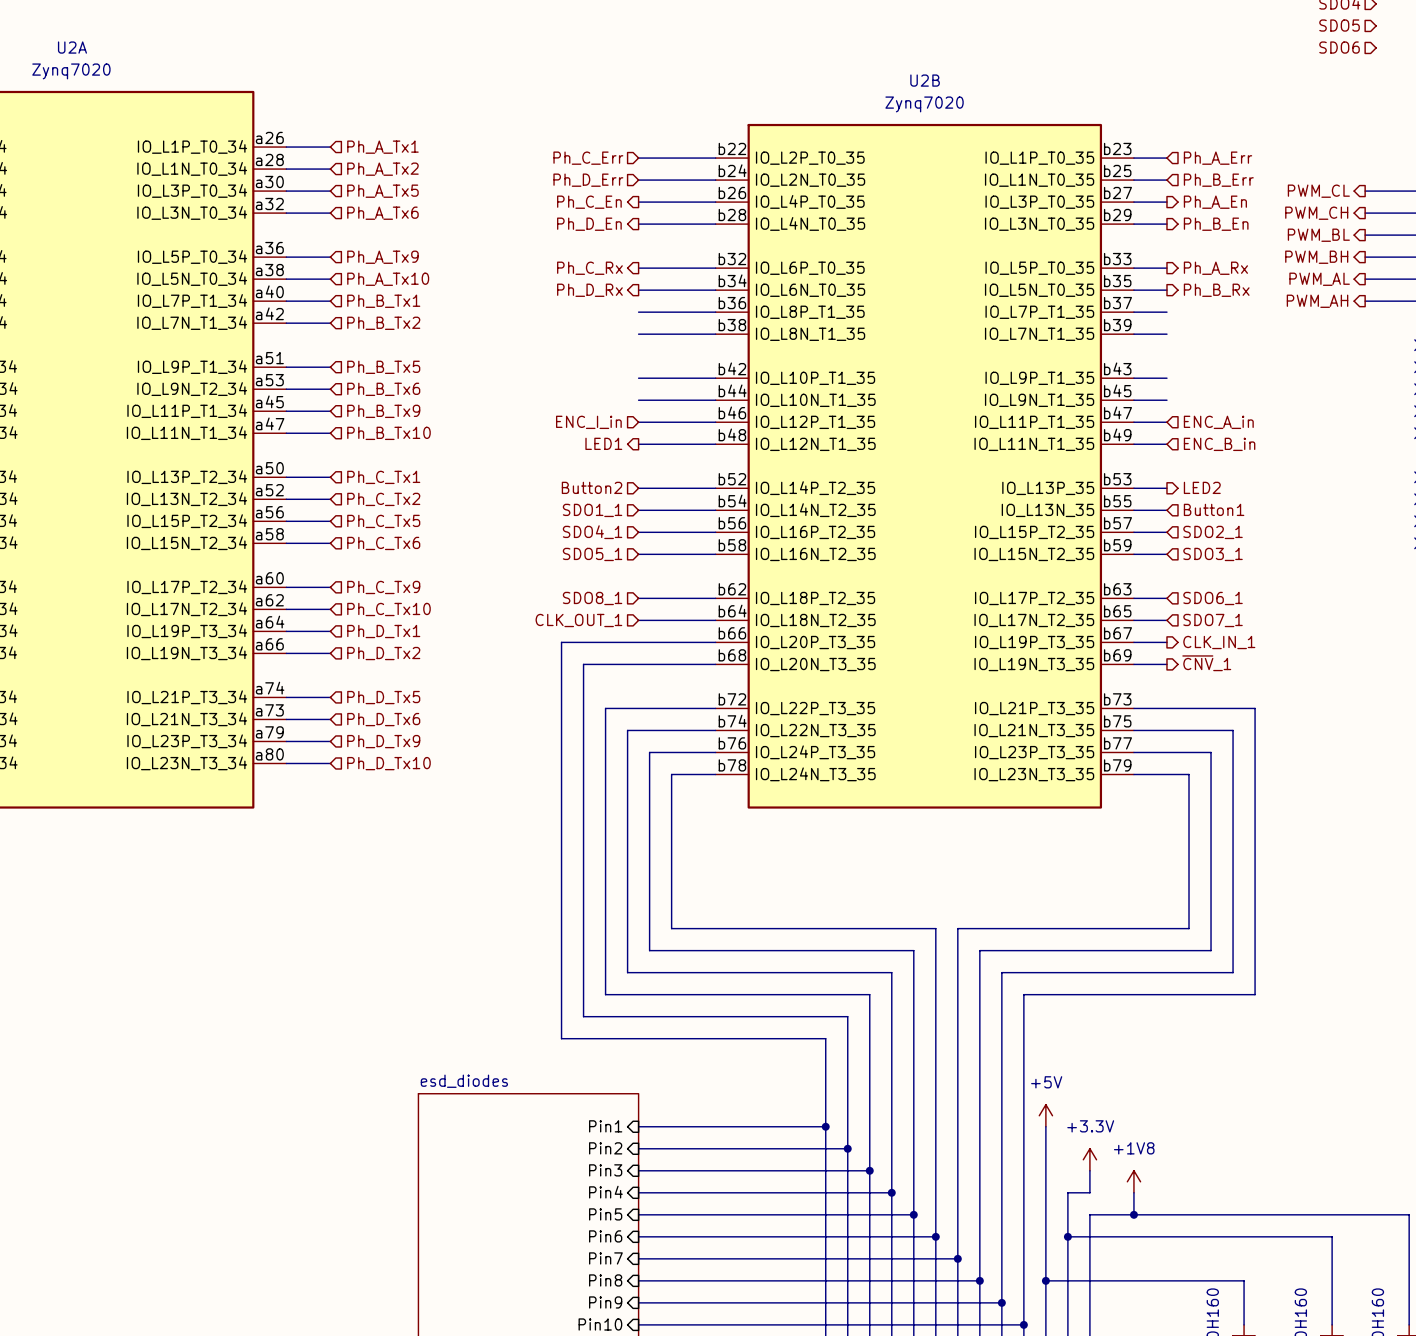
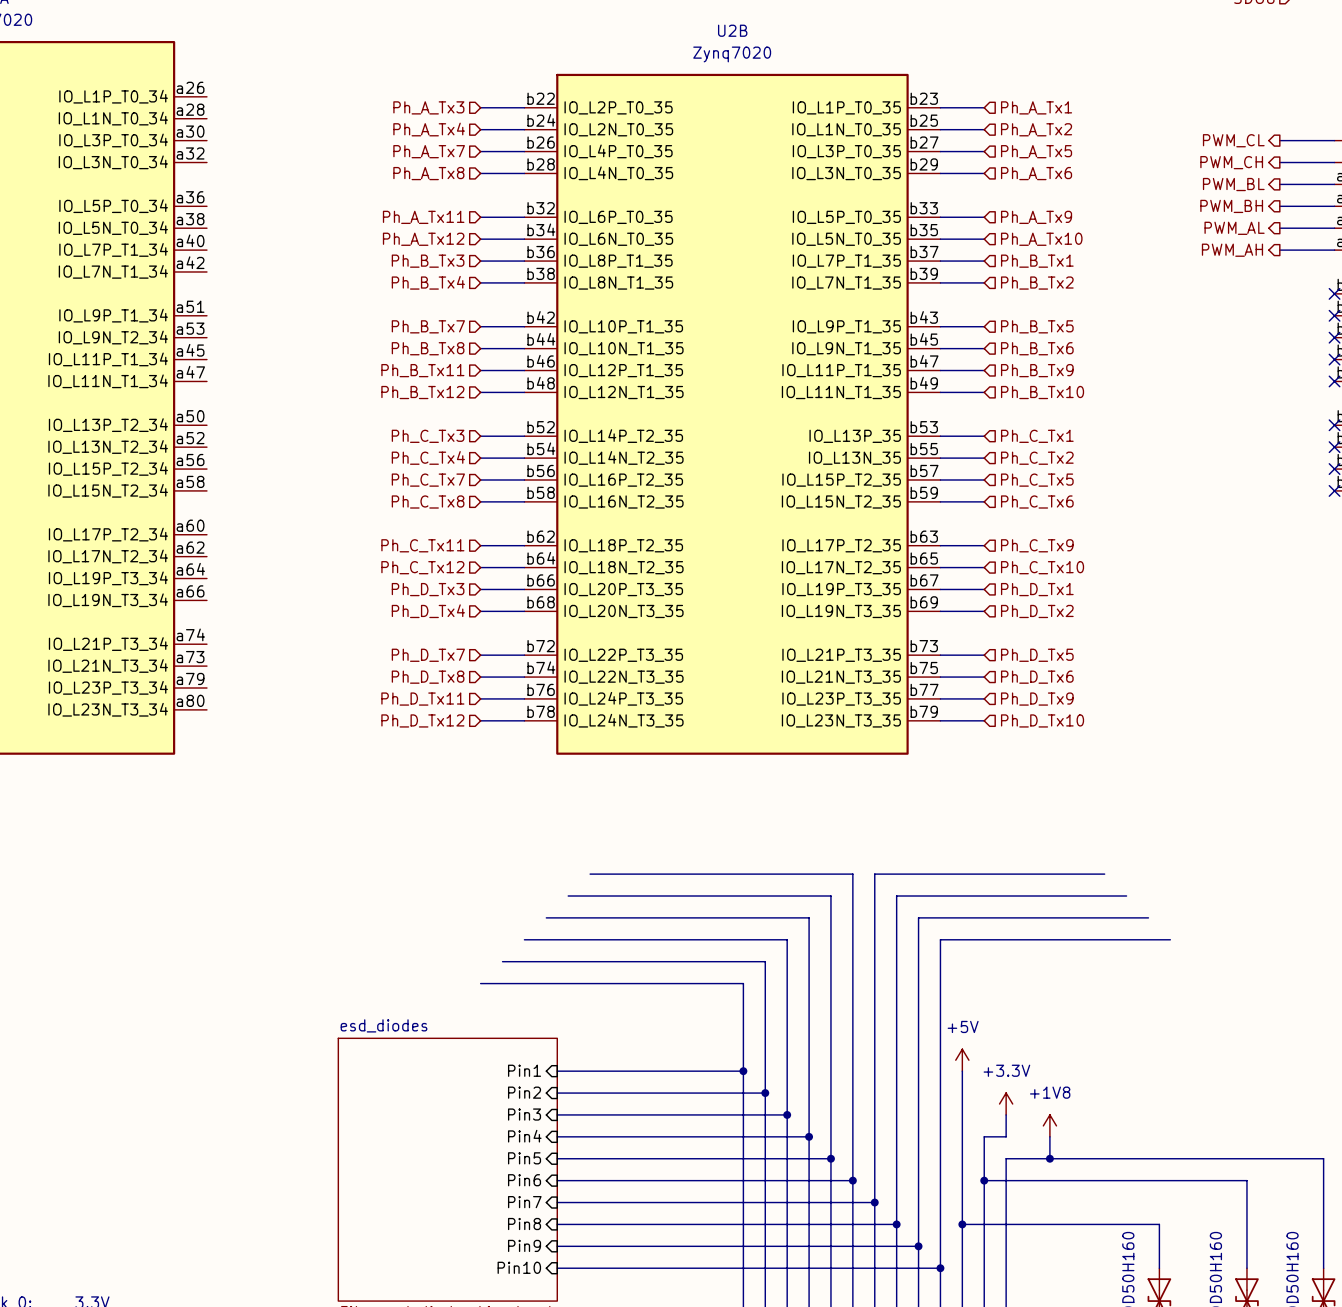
wire: (286, 147) (330, 147) -> none
hierarchical label: Ph_A_Tx1 (382, 147) -> none
hierarchical label: none -> Ph_A_Tx3 (428, 107)
wire: none -> (480, 107) (524, 107)
hierarchical label: Ph_C_Err (588, 158) -> none
hierarchical label: none -> Ph_A_Tx1 (1036, 107)
wire: (1133, 158) (1166, 158) -> none
hierarchical label: Ph_A_Err (1218, 158) -> none
wire: (286, 169) (330, 169) -> none
hierarchical label: Ph_A_Tx2 (382, 169) -> none
hierarchical label: none -> Ph_A_Tx4 (429, 129)
wire: none -> (480, 129) (524, 129)
hierarchical label: Ph_D_Err (588, 180) -> none
hierarchical label: none -> Ph_A_Tx2 (1036, 129)
wire: (1133, 180) (1166, 180) -> none
hierarchical label: Ph_B_Err (1218, 180) -> none
wire: (286, 191) (330, 191) -> none
hierarchical label: Ph_A_Tx5 (382, 191) -> none
hierarchical label: none -> Ph_A_Tx7 (429, 151)
wire: none -> (480, 151) (524, 151)
hierarchical label: Ph_C_En (589, 202) -> none
hierarchical label: none -> Ph_A_Tx5 (1036, 151)
wire: (1133, 202) (1166, 202) -> none
hierarchical label: Ph_A_En (1215, 202) -> none
wire: (286, 213) (330, 213) -> none
hierarchical label: Ph_A_Tx6 (382, 213) -> none
hierarchical label: none -> Ph_A_Tx8 (428, 173)
wire: none -> (480, 173) (524, 173)
hierarchical label: Ph_D_En (589, 224) -> none
hierarchical label: none -> Ph_A_Tx6 (1036, 173)
wire: (1133, 224) (1166, 224) -> none
hierarchical label: Ph_B_En (1216, 224) -> none
wire: (286, 257) (330, 257) -> none
hierarchical label: Ph_A_Tx9 (382, 257) -> none
hierarchical label: none -> Ph_A_Tx11 (423, 217)
wire: none -> (480, 217) (524, 217)
hierarchical label: Ph_C_Rx (589, 268) -> none
hierarchical label: none -> Ph_A_Tx9 (1036, 217)
wire: (1133, 268) (1166, 268) -> none
hierarchical label: Ph_A_Rx (1215, 268) -> none
wire: (286, 279) (330, 279) -> none
hierarchical label: Ph_A_Tx10 (388, 279) -> none
hierarchical label: none -> Ph_A_Tx12 (423, 239)
wire: none -> (480, 239) (524, 239)
hierarchical label: Ph_D_Rx (589, 290) -> none
hierarchical label: none -> Ph_A_Tx10 (1041, 239)
wire: (1133, 290) (1166, 290) -> none
hierarchical label: Ph_B_Rx (1216, 290) -> none
wire: (286, 301) (330, 301) -> none
hierarchical label: Ph_B_Tx1 (383, 301) -> none
hierarchical label: none -> Ph_B_Tx3 (428, 261)
wire: none -> (480, 261) (524, 261)
hierarchical label: none -> Ph_B_Tx1 (1037, 261)
wire: (1133, 312) (1166, 312) -> none
wire: (286, 323) (330, 323) -> none
hierarchical label: Ph_B_Tx2 (383, 323) -> none
hierarchical label: none -> Ph_B_Tx4 (428, 282)
wire: none -> (480, 282) (524, 282)
hierarchical label: none -> Ph_B_Tx2 (1037, 283)
wire: (1133, 334) (1166, 334) -> none
wire: (286, 367) (330, 367) -> none
hierarchical label: Ph_B_Tx5 (383, 367) -> none
hierarchical label: none -> Ph_B_Tx7 (428, 326)
wire: none -> (480, 326) (524, 326)
hierarchical label: none -> Ph_B_Tx5 (1037, 326)
wire: (1133, 378) (1166, 378) -> none
wire: (286, 389) (330, 389) -> none
hierarchical label: Ph_B_Tx6 (383, 389) -> none
hierarchical label: none -> Ph_B_Tx8 (428, 348)
wire: none -> (480, 348) (524, 348)
hierarchical label: none -> Ph_B_Tx6 (1037, 348)
wire: (1133, 400) (1166, 400) -> none
wire: (286, 411) (330, 411) -> none
hierarchical label: Ph_B_Tx9 (383, 411) -> none
hierarchical label: none -> Ph_B_Tx11 (422, 370)
wire: none -> (480, 370) (524, 370)
hierarchical label: ENC_I_in (588, 422) -> none
hierarchical label: none -> Ph_B_Tx9 (1037, 370)
wire: (1133, 422) (1166, 422) -> none
hierarchical label: ENC_A_in (1218, 422) -> none
wire: (286, 433) (330, 433) -> none
hierarchical label: Ph_B_Tx10 (388, 433) -> none
hierarchical label: LED1 (603, 443) -> none
hierarchical label: none -> Ph_B_Tx12 (422, 392)
wire: none -> (480, 392) (524, 392)
hierarchical label: none -> Ph_B_Tx10 (1042, 392)
wire: (1133, 444) (1166, 444) -> none
hierarchical label: ENC_B_in (1219, 444) -> none
U2B position: (924, 466) -> (732, 414)
wire: (286, 477) (330, 477) -> none
hierarchical label: Ph_C_Tx1 (383, 477) -> none
hierarchical label: Button2 (592, 487) -> none
hierarchical label: LED2 (1202, 487) -> none
hierarchical label: none -> Ph_C_Tx3 (428, 436)
wire: none -> (480, 436) (524, 436)
hierarchical label: none -> Ph_C_Tx1 (1037, 436)
wire: (1133, 488) (1166, 488) -> none
wire: (286, 499) (330, 499) -> none
hierarchical label: Ph_C_Tx2 (383, 499) -> none
hierarchical label: Button1 (1214, 509) -> none
hierarchical label: none -> Ph_C_Tx4 (428, 457)
wire: none -> (480, 458) (524, 458)
hierarchical label: SDO1_1 (592, 510) -> none
hierarchical label: none -> Ph_C_Tx2 (1037, 458)
wire: (1133, 510) (1166, 510) -> none
wire: (286, 521) (330, 521) -> none
hierarchical label: Ph_C_Tx5 (383, 521) -> none
hierarchical label: none -> Ph_C_Tx7 (428, 480)
wire: none -> (480, 479) (524, 479)
hierarchical label: SDO4_1 (592, 532) -> none
hierarchical label: none -> Ph_C_Tx5 (1037, 480)
wire: (1133, 532) (1166, 532) -> none
hierarchical label: SDO2_1 (1213, 532) -> none
wire: (286, 543) (330, 543) -> none
hierarchical label: Ph_C_Tx6 (383, 543) -> none
hierarchical label: none -> Ph_C_Tx8 (428, 502)
wire: none -> (480, 501) (524, 501)
hierarchical label: SDO5_1 (592, 554) -> none
hierarchical label: none -> Ph_C_Tx6 (1037, 502)
wire: (1133, 554) (1166, 554) -> none
hierarchical label: SDO3_1 (1213, 554) -> none
wire: (286, 587) (330, 587) -> none
hierarchical label: Ph_C_Tx9 (383, 587) -> none
hierarchical label: none -> Ph_C_Tx11 (422, 545)
wire: none -> (480, 545) (524, 545)
hierarchical label: SDO8_1 (592, 598) -> none
hierarchical label: none -> Ph_C_Tx9 (1037, 545)
wire: (1133, 598) (1166, 598) -> none
hierarchical label: SDO6_1 (1213, 598) -> none
wire: (286, 609) (330, 609) -> none
hierarchical label: Ph_C_Tx10 (388, 609) -> none
hierarchical label: none -> Ph_C_Tx12 (422, 567)
wire: none -> (480, 567) (524, 567)
hierarchical label: CLK_OUT_1 (578, 620) -> none
hierarchical label: none -> Ph_C_Tx10 (1042, 567)
wire: (1133, 620) (1166, 620) -> none
hierarchical label: SDO7_1 (1213, 620) -> none
wire: (286, 631) (330, 631) -> none
hierarchical label: Ph_D_Tx1 (383, 631) -> none
hierarchical label: none -> Ph_D_Tx3 (428, 589)
wire: (561, 642) (561, 1038) -> none
hierarchical label: none -> Ph_D_Tx1 (1037, 589)
wire: (1133, 642) (1166, 642) -> none
hierarchical label: CLK_IN_1 (1219, 642) -> none
wire: (286, 653) (330, 653) -> none
hierarchical label: Ph_D_Tx2 (383, 653) -> none
hierarchical label: ~{CNV}_1 (1206, 663) -> none
hierarchical label: none -> Ph_D_Tx4 (428, 611)
wire: (583, 664) (583, 1016) -> (502, 611) (480, 611)
hierarchical label: none -> Ph_D_Tx2 (1037, 611)
wire: (1133, 664) (1166, 664) -> none
wire: (286, 697) (330, 697) -> none
hierarchical label: Ph_D_Tx5 (383, 697) -> none
hierarchical label: none -> Ph_D_Tx7 (428, 655)
wire: none -> (480, 655) (524, 655)
wire: (715, 708) (605, 708) (605, 994) -> none
hierarchical label: none -> Ph_D_Tx5 (1037, 655)
wire: (1133, 708) (1255, 708) (1255, 994) -> none
wire: (286, 719) (330, 719) -> none
hierarchical label: Ph_D_Tx6 (383, 719) -> none
hierarchical label: none -> Ph_D_Tx8 (428, 677)
wire: none -> (480, 677) (524, 677)
wire: (715, 730) (627, 730) (627, 972) -> none
hierarchical label: none -> Ph_D_Tx6 (1037, 677)
wire: (1133, 730) (1233, 730) (1233, 972) -> none
wire: (286, 741) (330, 741) -> none
hierarchical label: Ph_D_Tx9 (383, 741) -> none
hierarchical label: none -> Ph_D_Tx11 (422, 699)
wire: none -> (480, 698) (524, 698)
wire: (715, 752) (649, 752) (649, 950) -> none
hierarchical label: none -> Ph_D_Tx9 (1037, 699)
wire: (1133, 752) (1211, 752) (1211, 950) -> none
wire: (286, 763) (330, 763) -> none
hierarchical label: Ph_D_Tx10 (388, 763) -> none
hierarchical label: none -> Ph_D_Tx12 (422, 720)
wire: none -> (480, 720) (524, 720)
wire: (715, 774) (671, 774) (671, 928) -> none
hierarchical label: none -> Ph_D_Tx10 (1042, 720)
wire: (1133, 774) (1189, 774) (1189, 928) -> none

